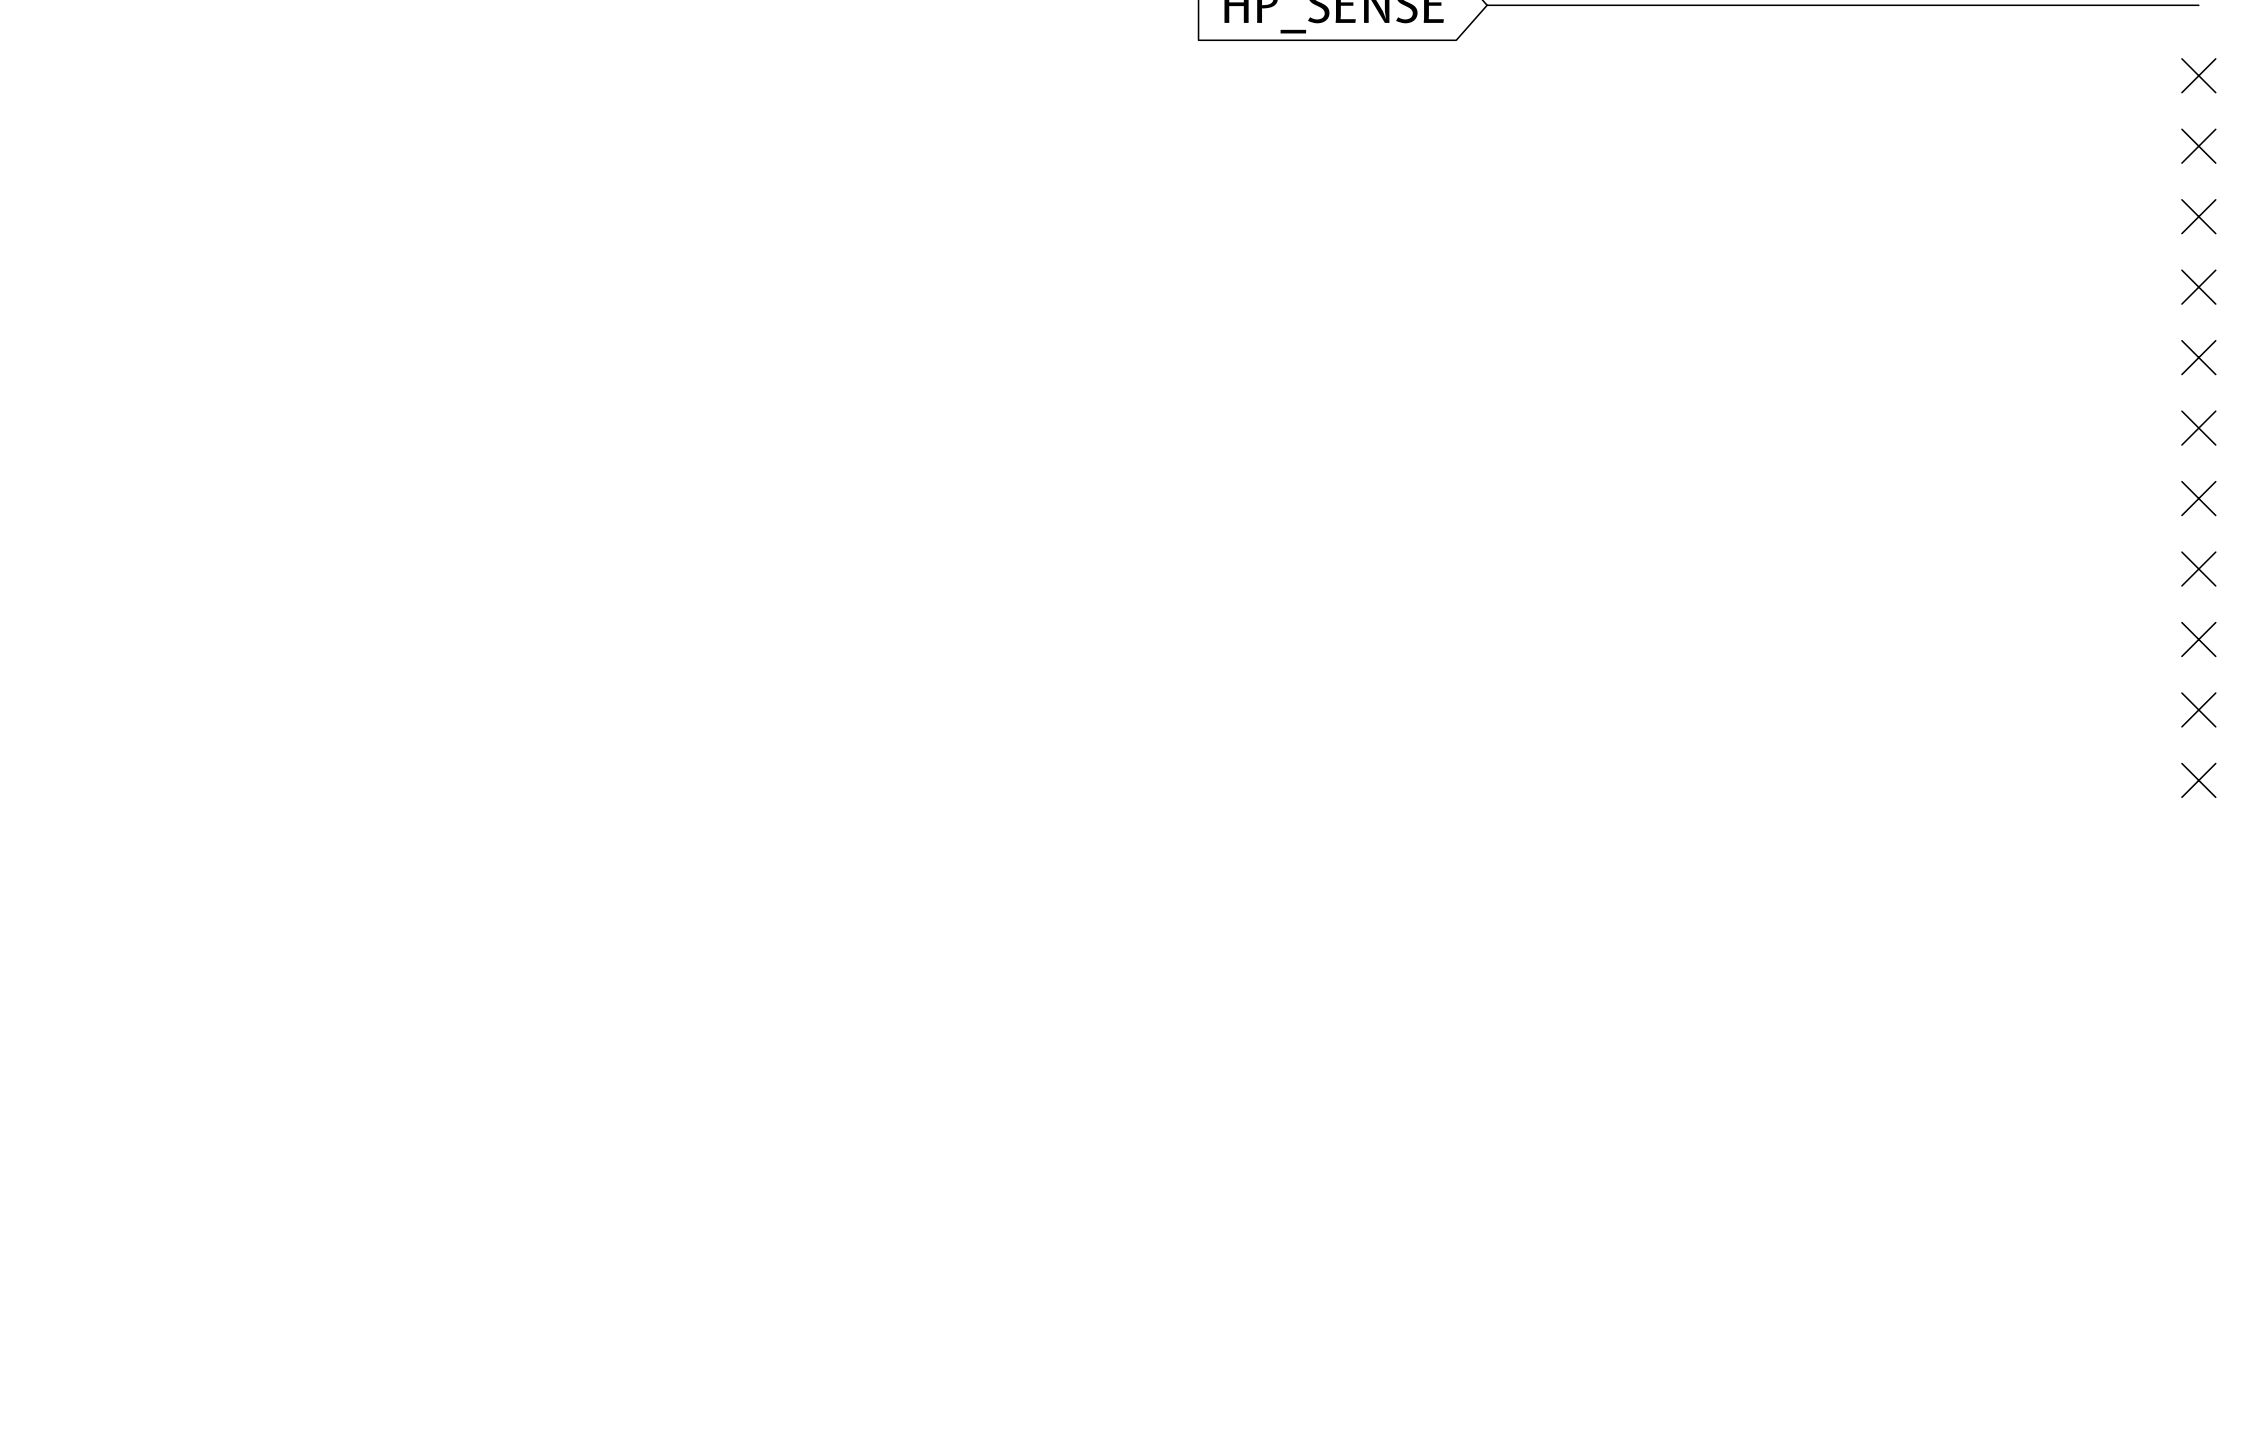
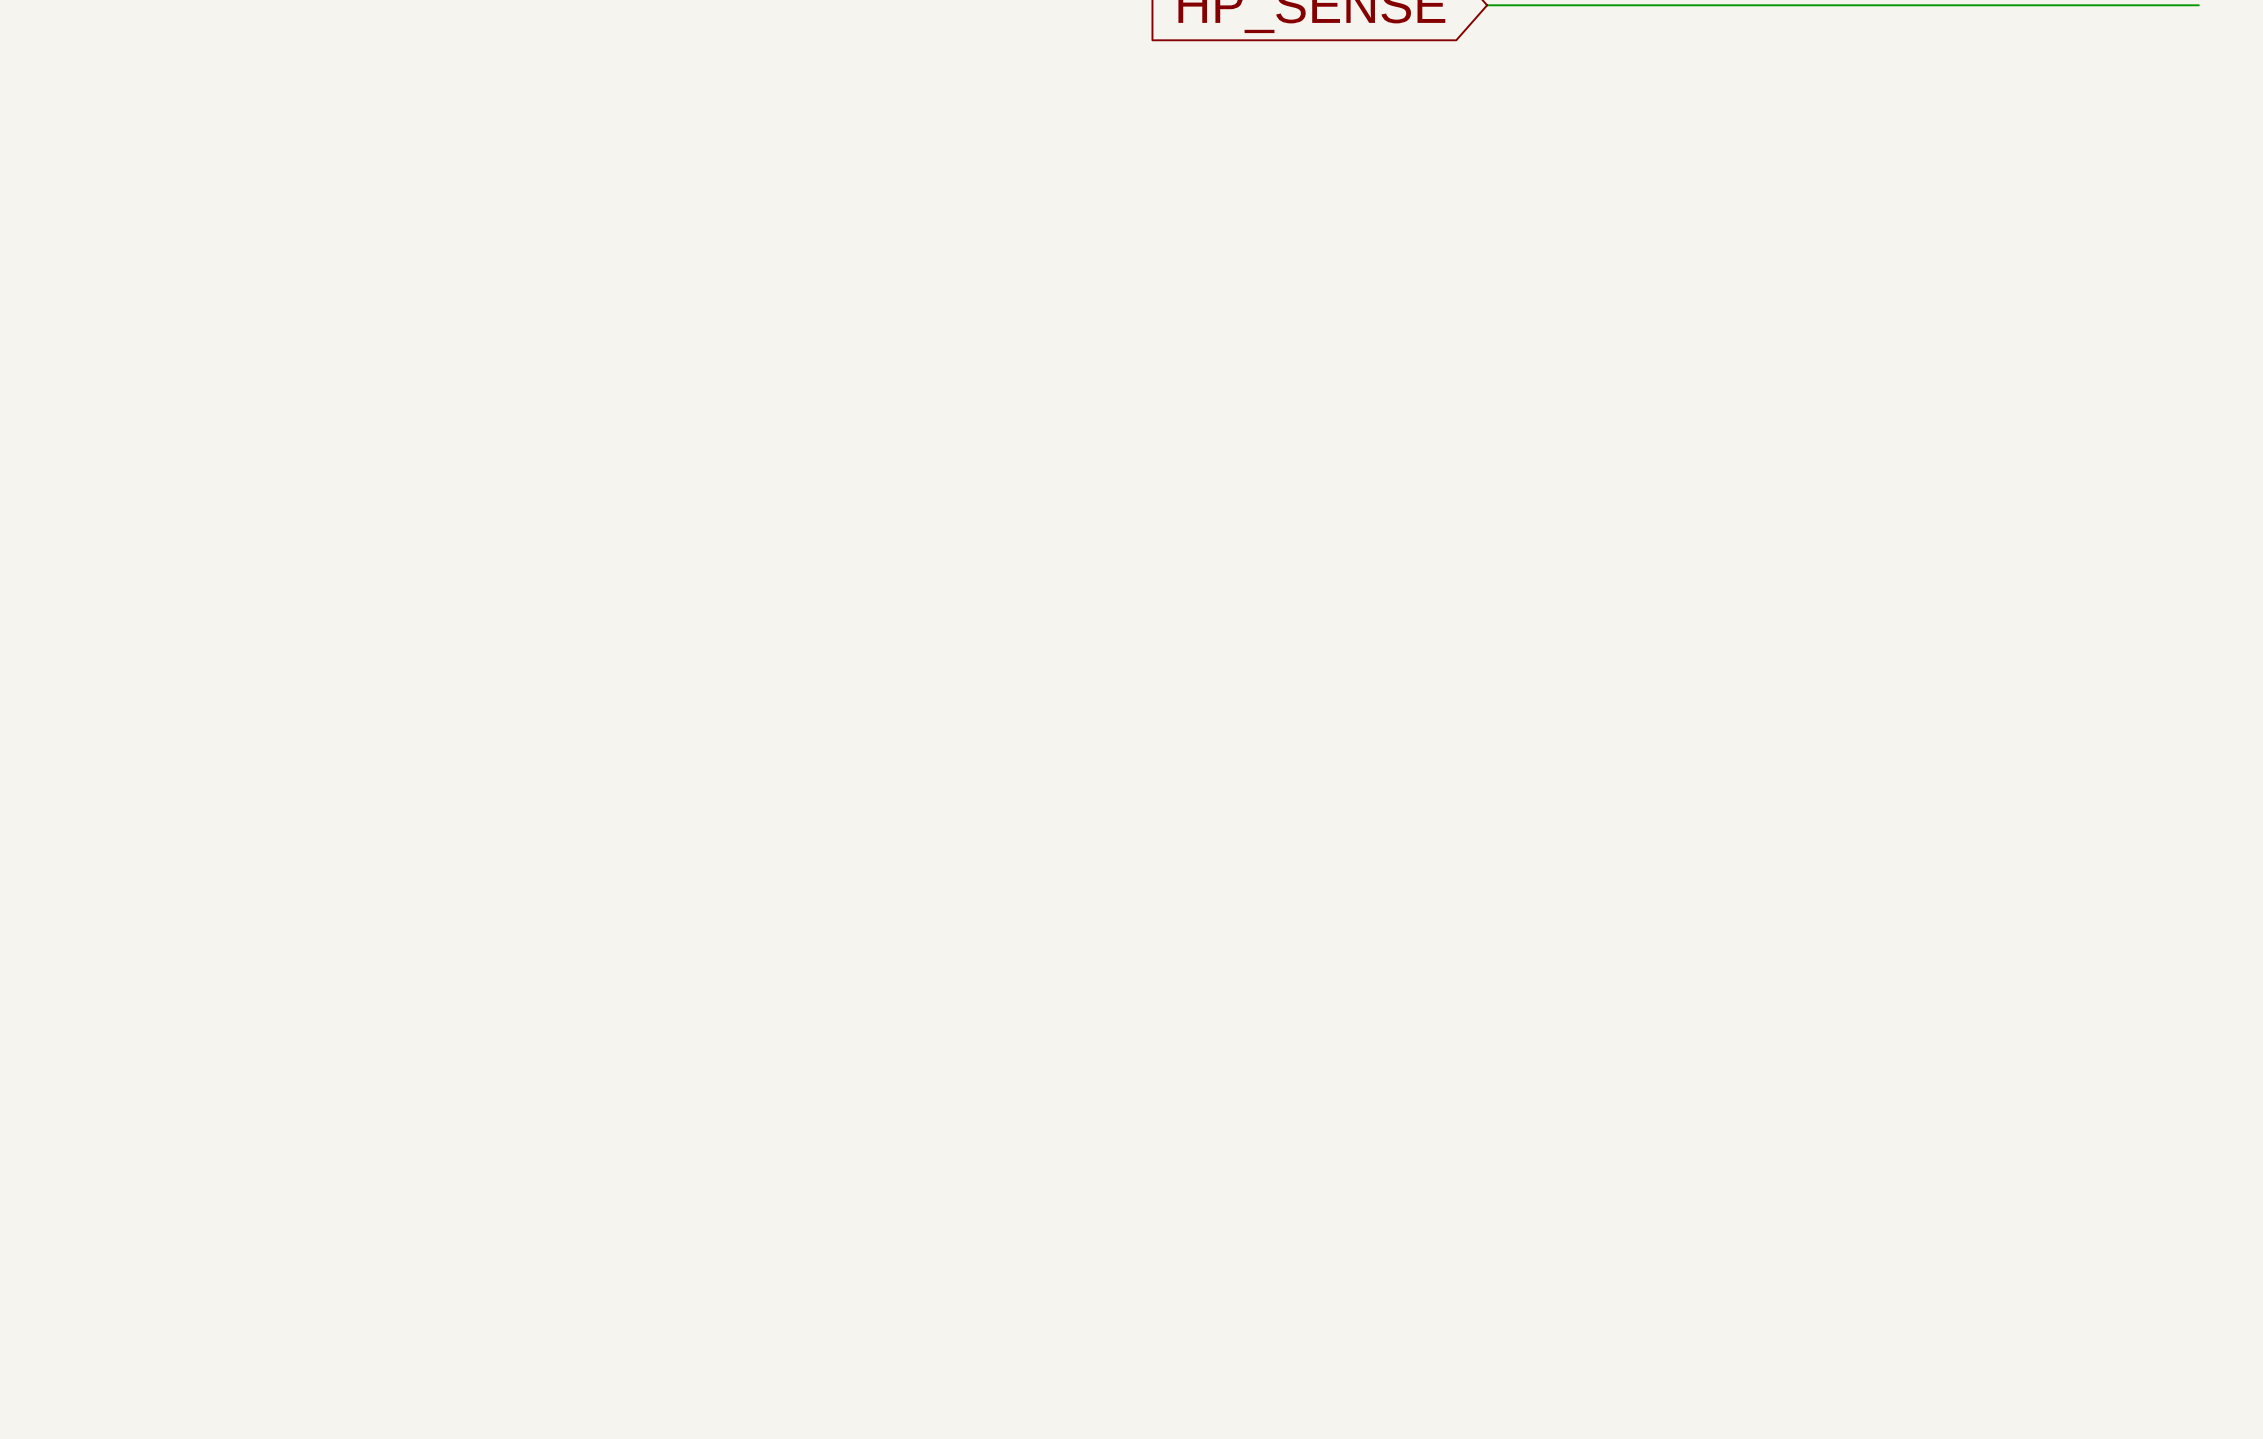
no-connect mark: (2198, 75) -> none
no-connect mark: (2198, 146) -> none
no-connect mark: (2198, 216) -> none
no-connect mark: (2198, 287) -> none
no-connect mark: (2198, 357) -> none
no-connect mark: (2198, 428) -> none
no-connect mark: (2198, 498) -> none
no-connect mark: (2198, 569) -> none
no-connect mark: (2198, 639) -> none
no-connect mark: (2198, 709) -> none
no-connect mark: (2198, 780) -> none

